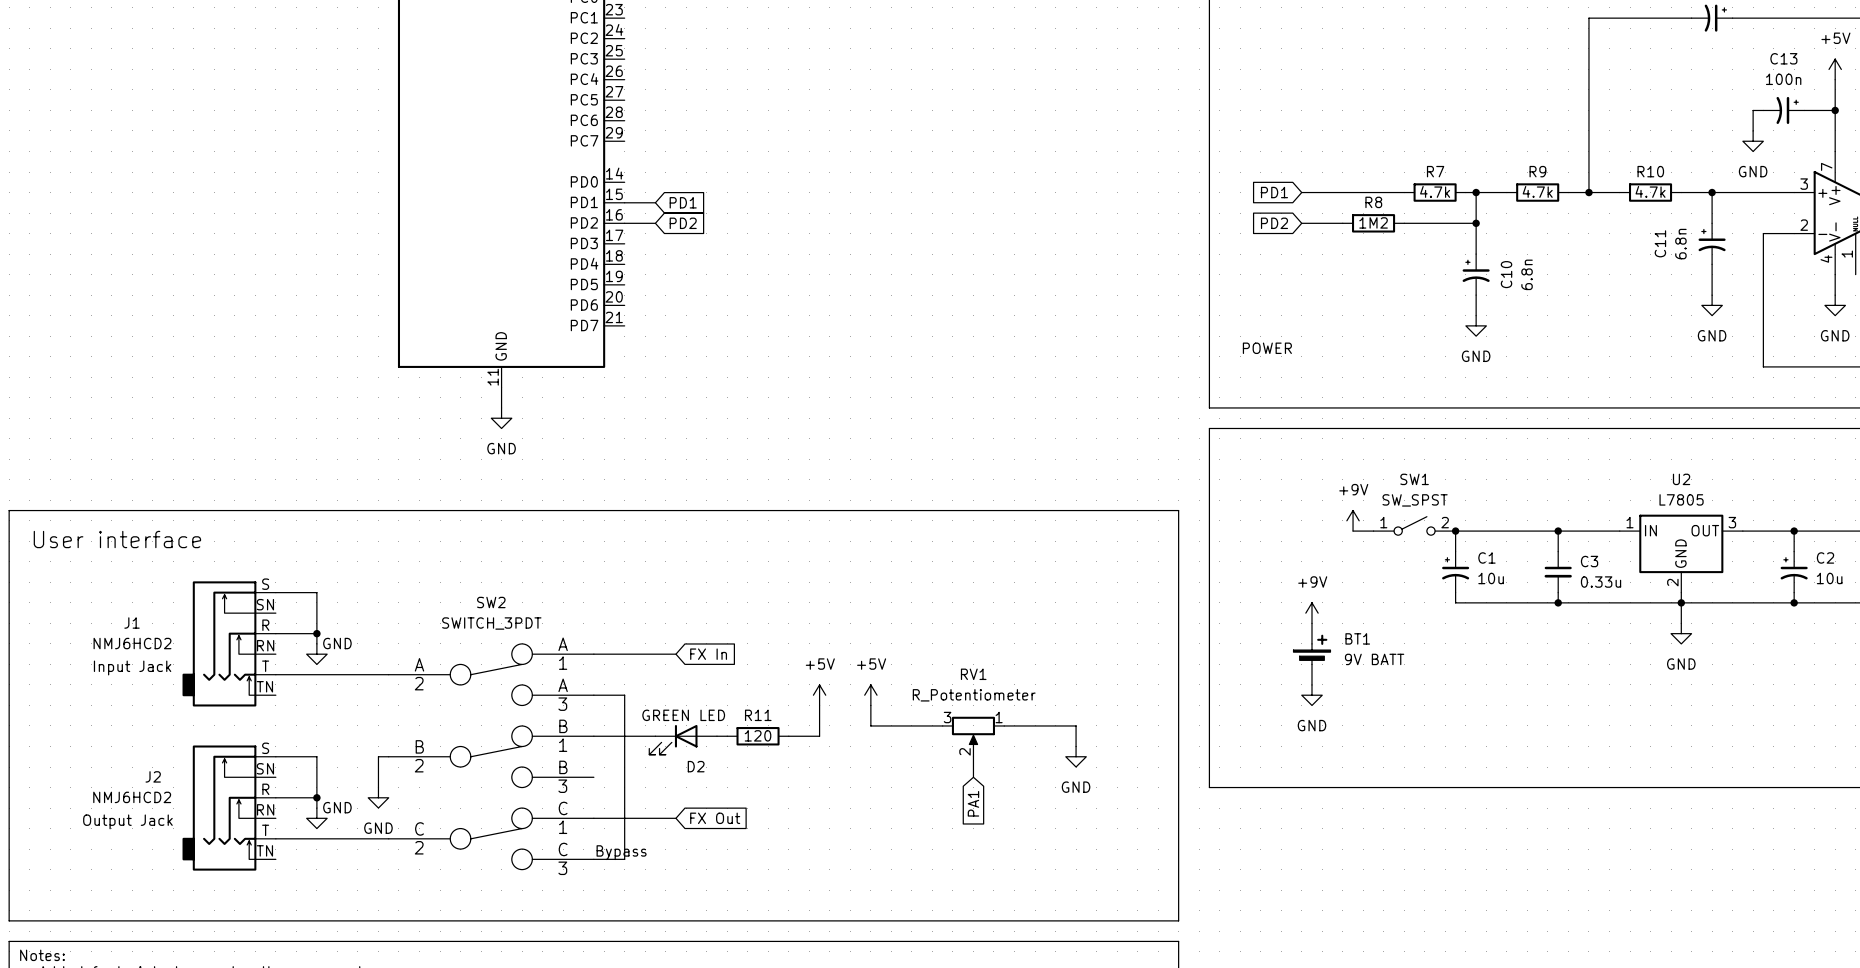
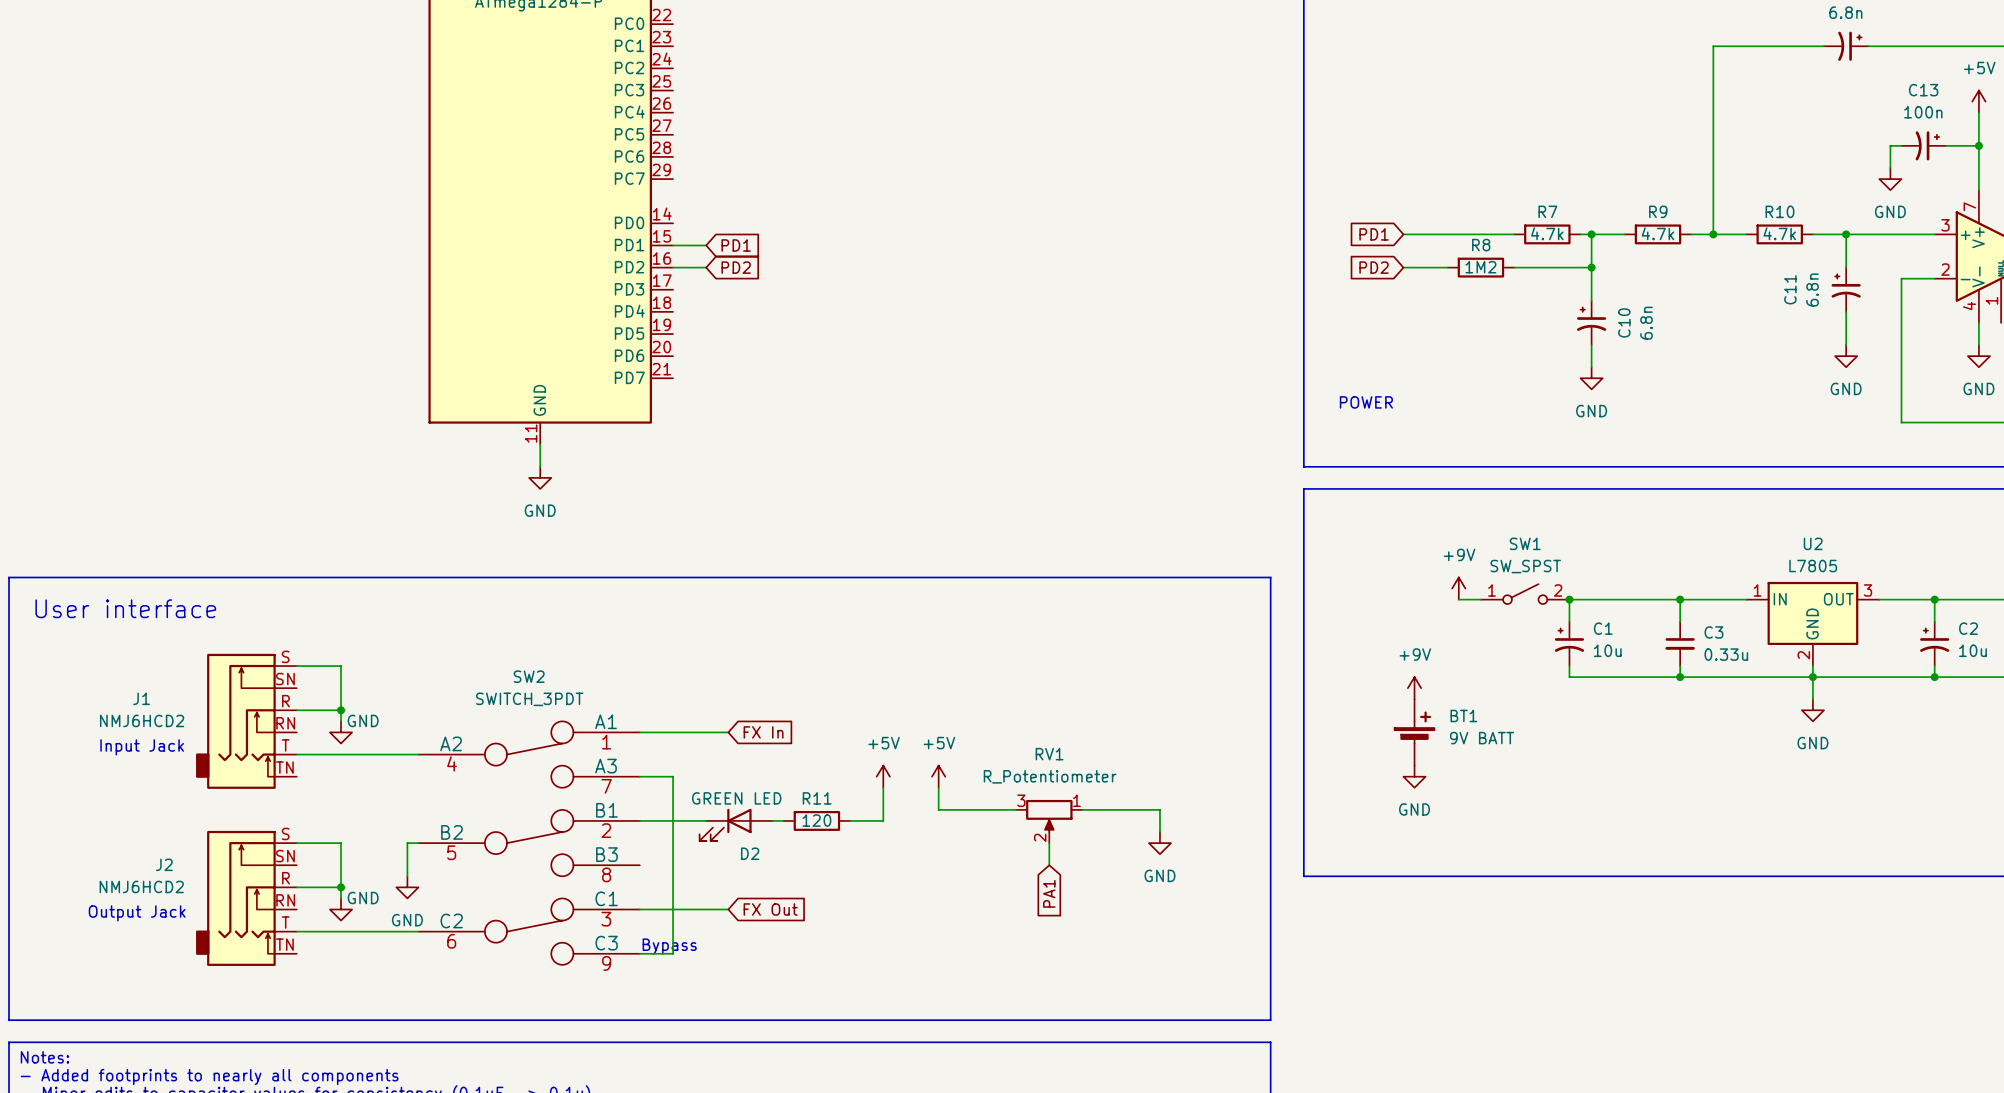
SW2 symbol: [388, 643, 594, 870] -> [418, 721, 640, 965]

